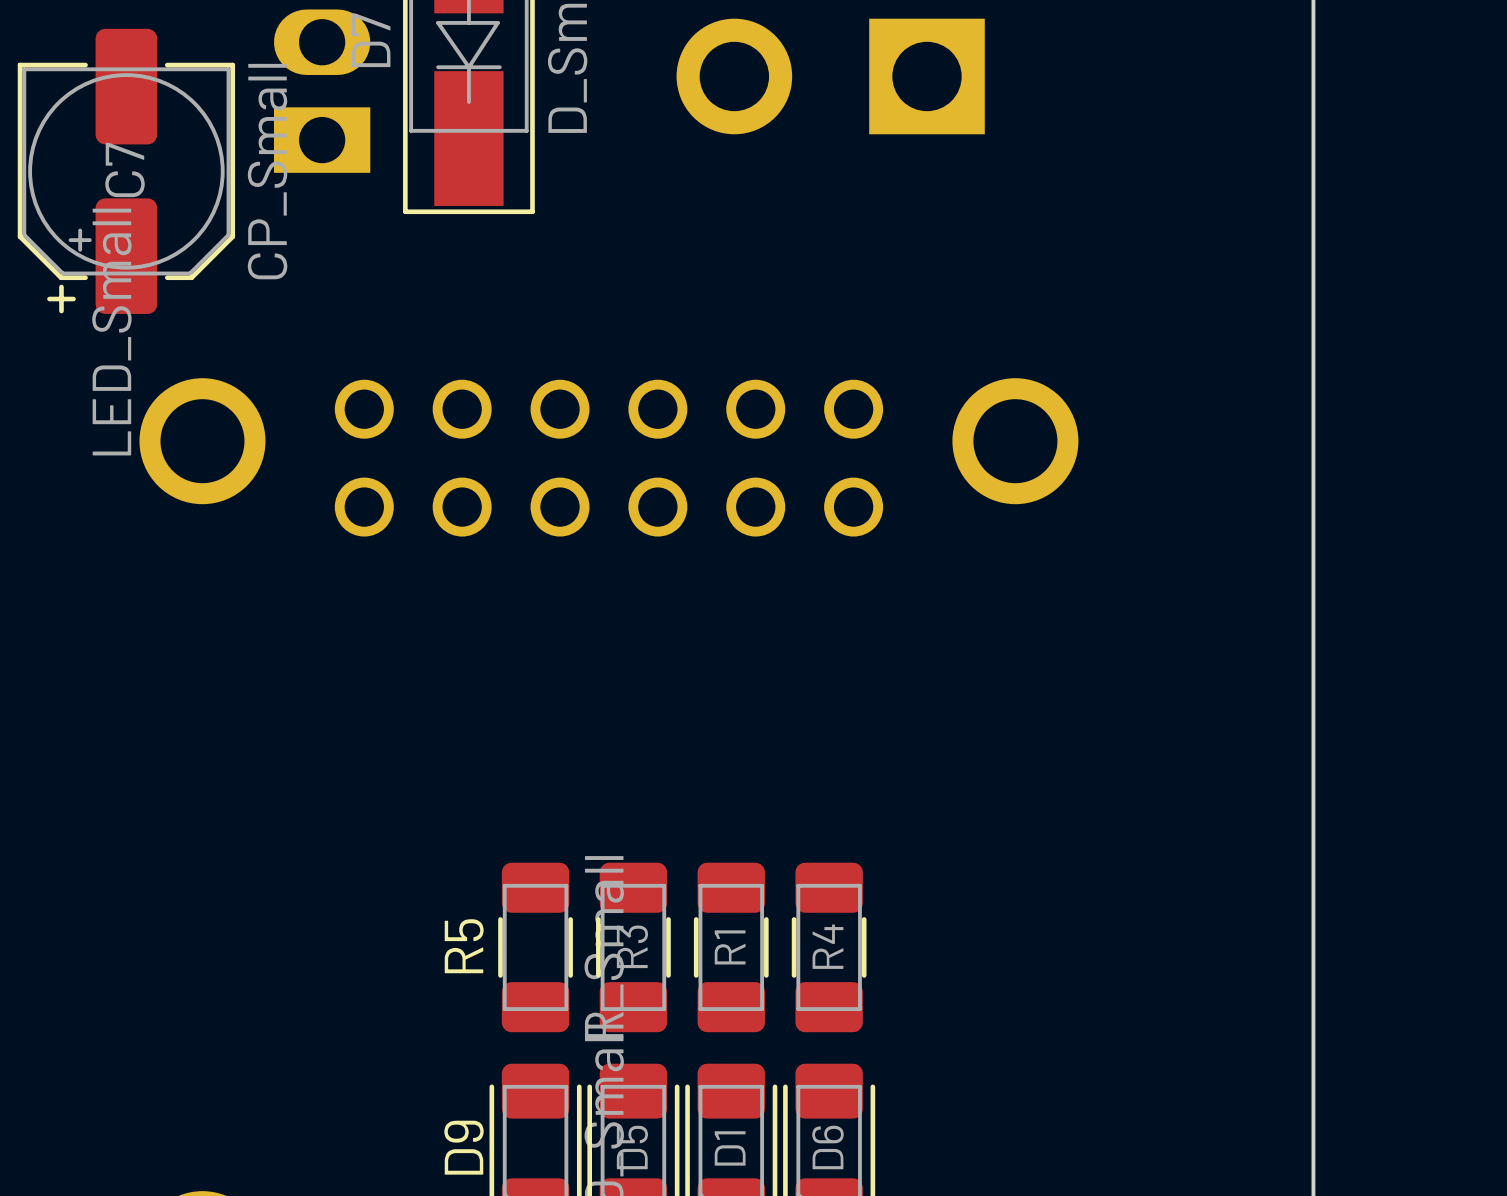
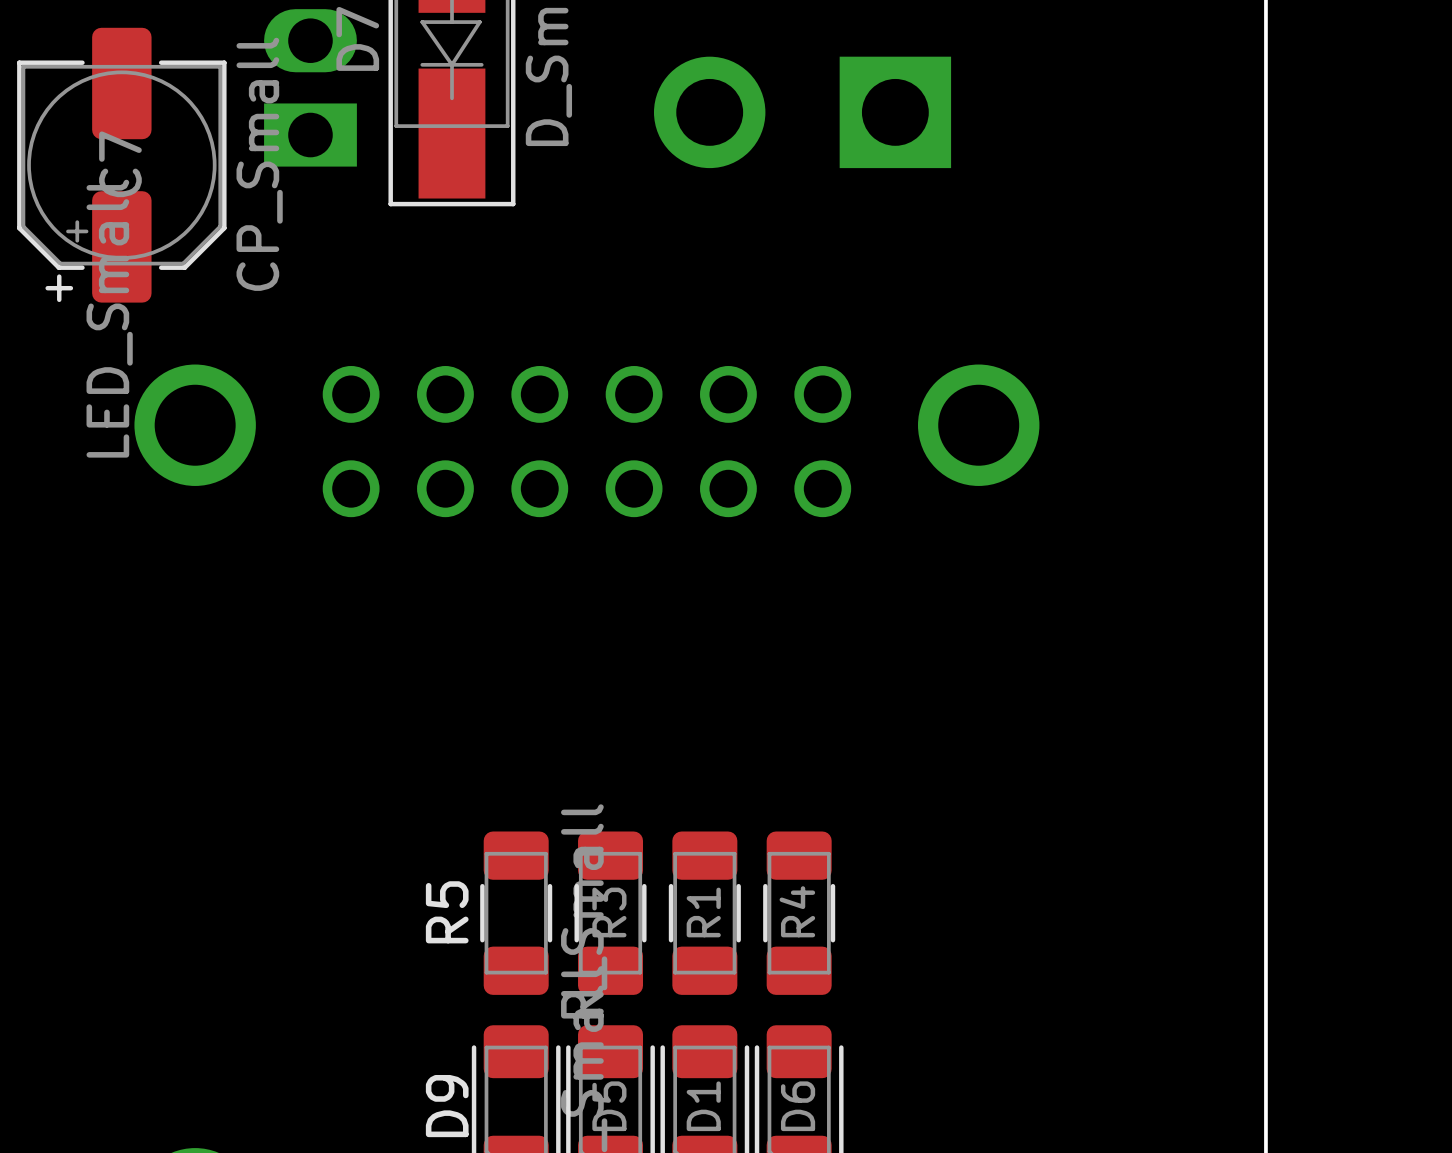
part position: (830, 76) -> (802, 112)

